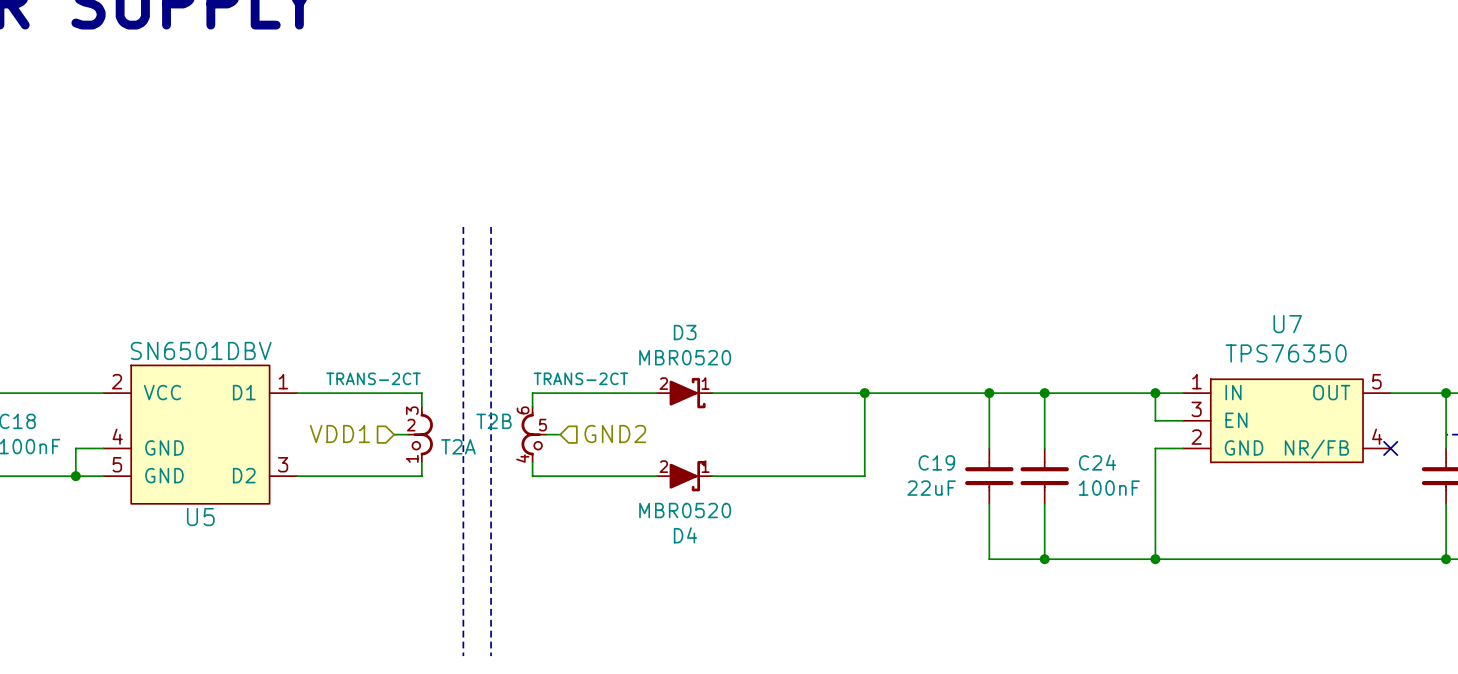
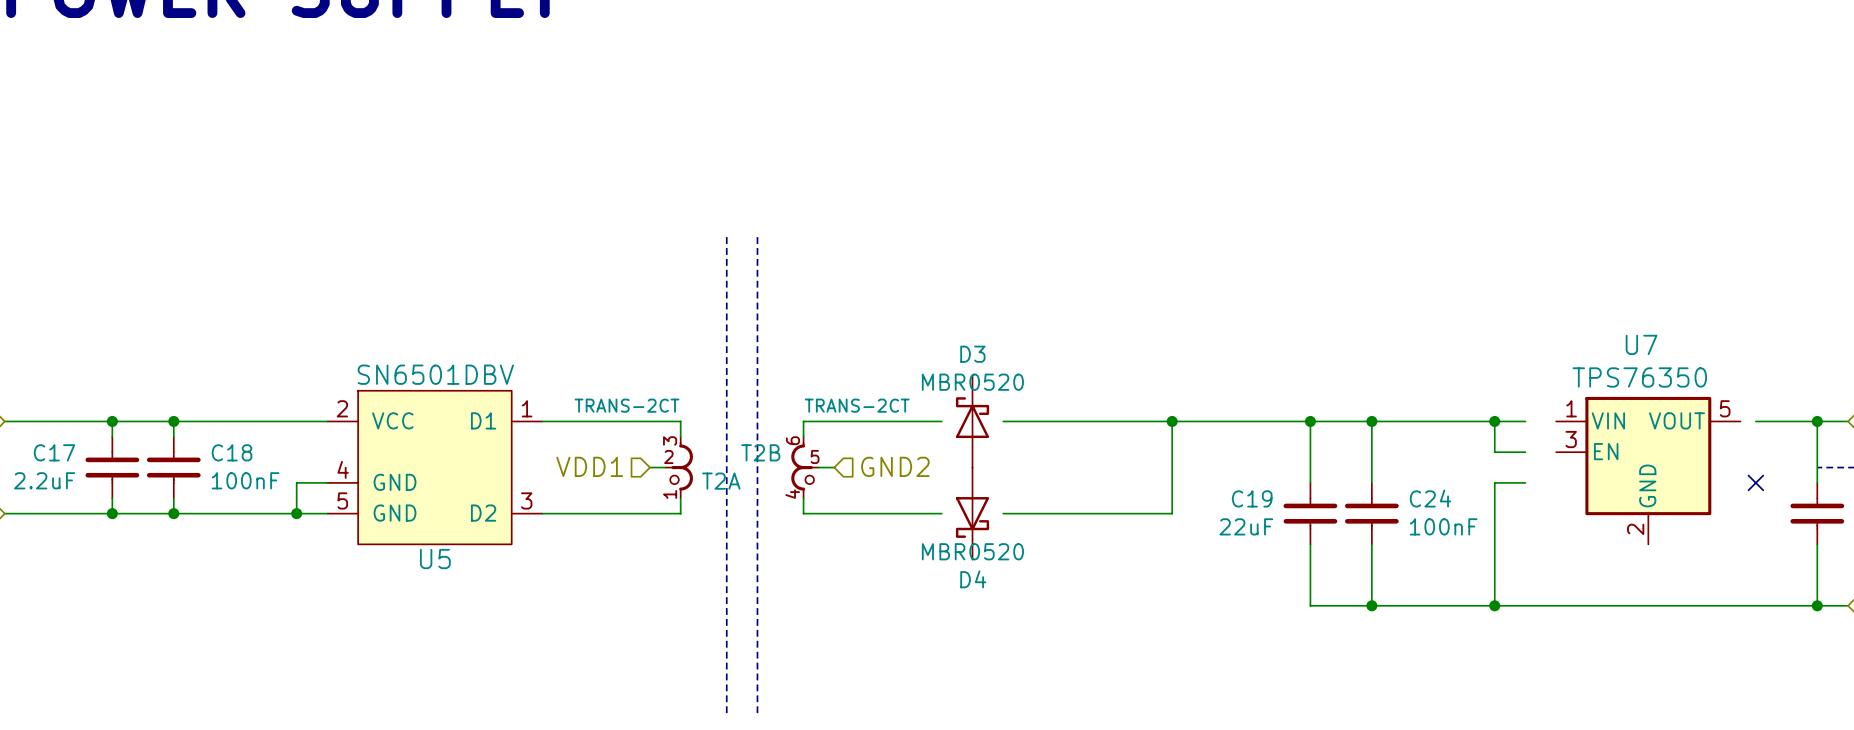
D3 symbol: [657, 377, 713, 409] -> [955, 375, 990, 468]
U7 symbol: [1183, 379, 1391, 463] -> [1556, 396, 1741, 545]
D4 symbol: [657, 460, 713, 492] -> [955, 467, 990, 560]

